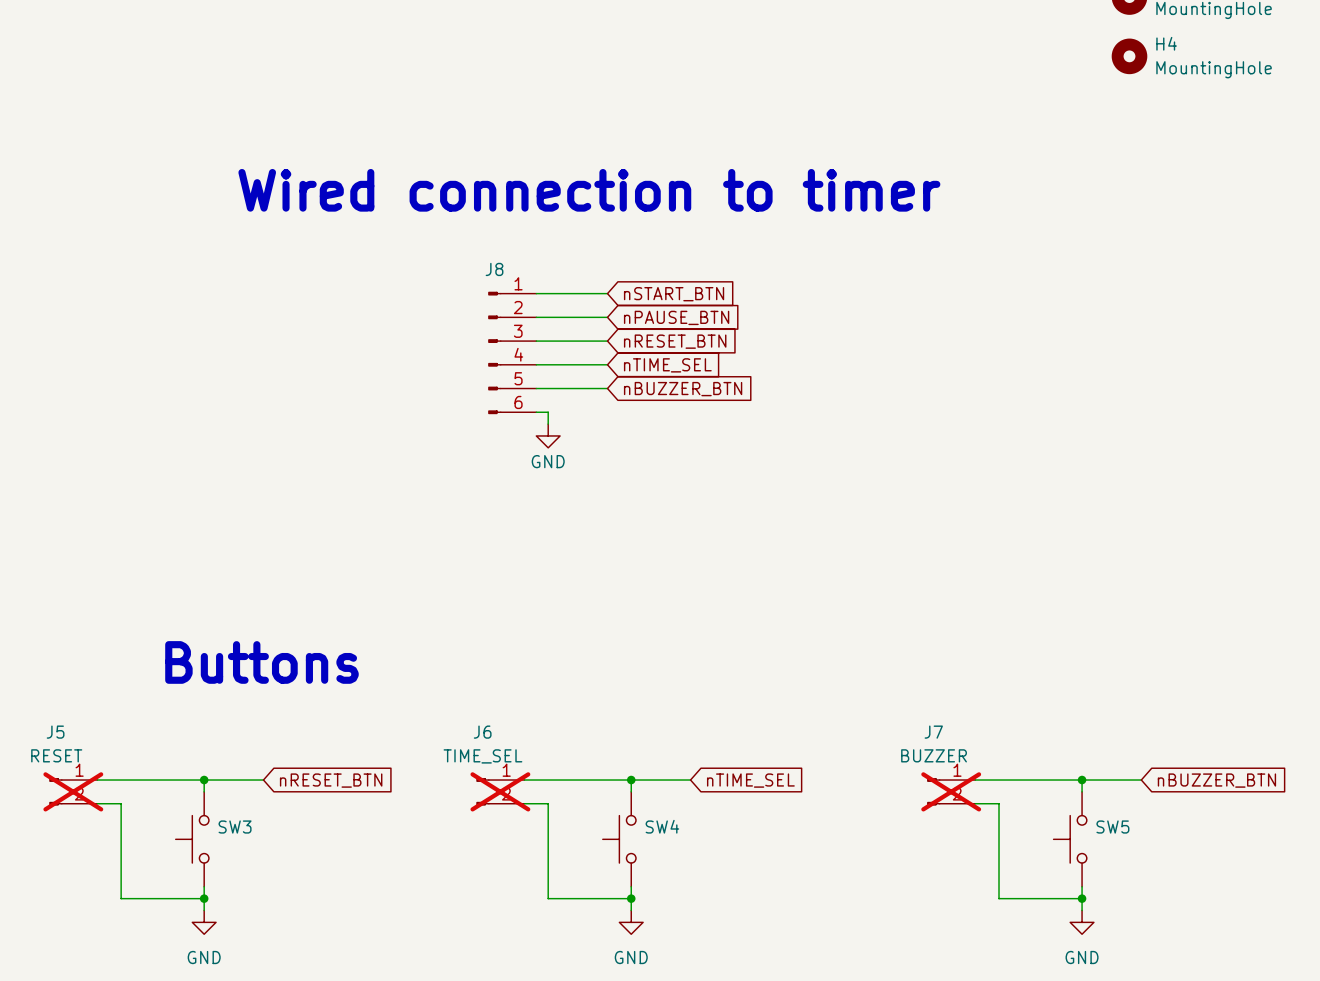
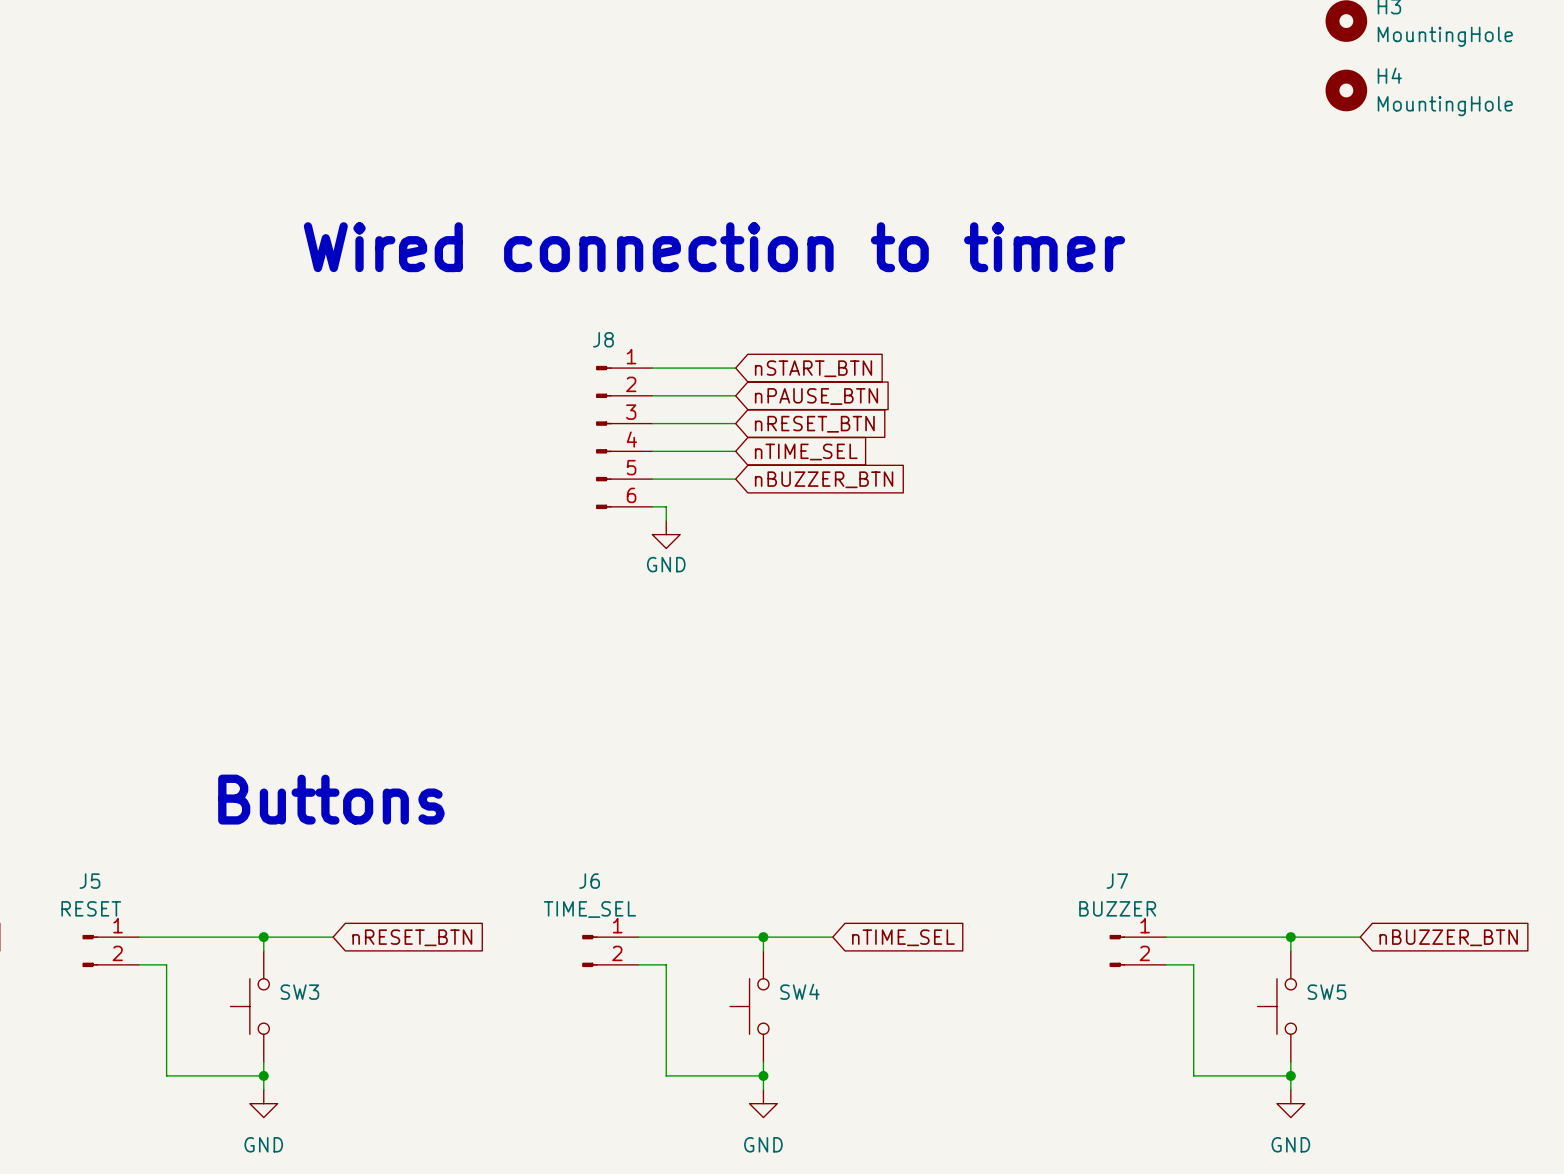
J5 do-not-place cross: (73, 791) -> none
J6 do-not-place cross: (500, 791) -> none
J7 do-not-place cross: (951, 791) -> none

